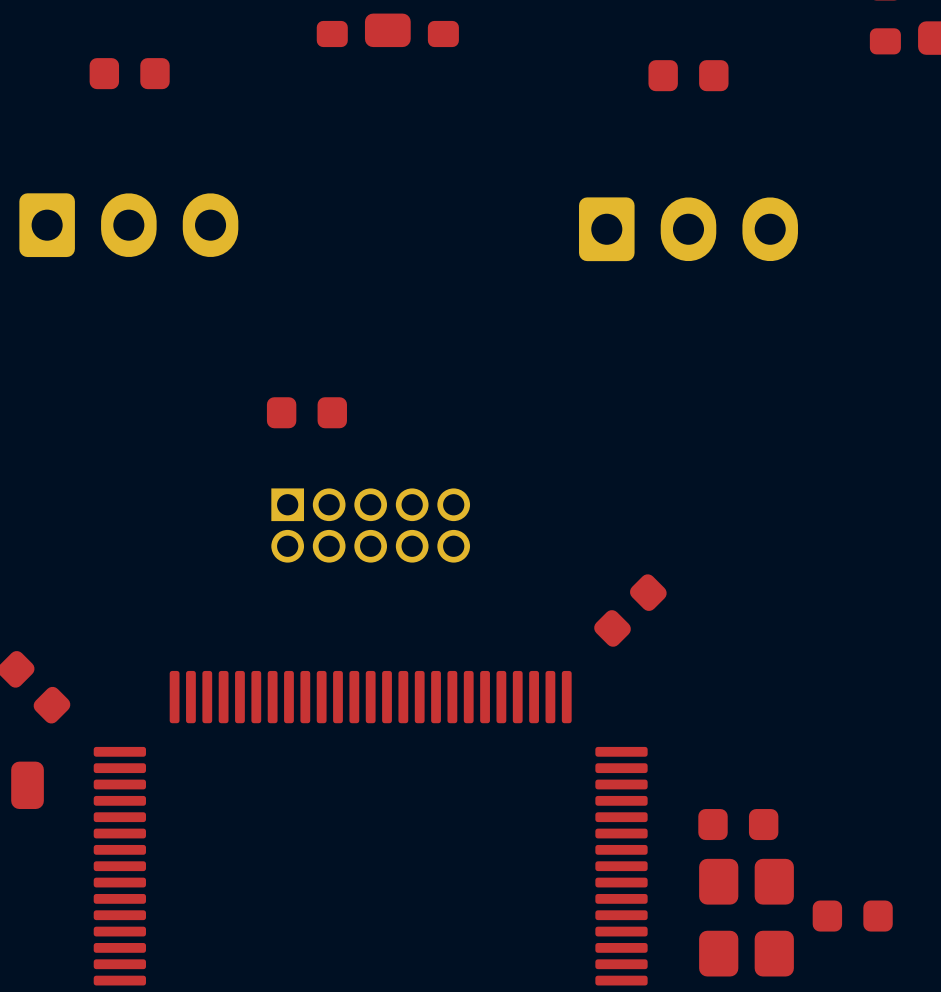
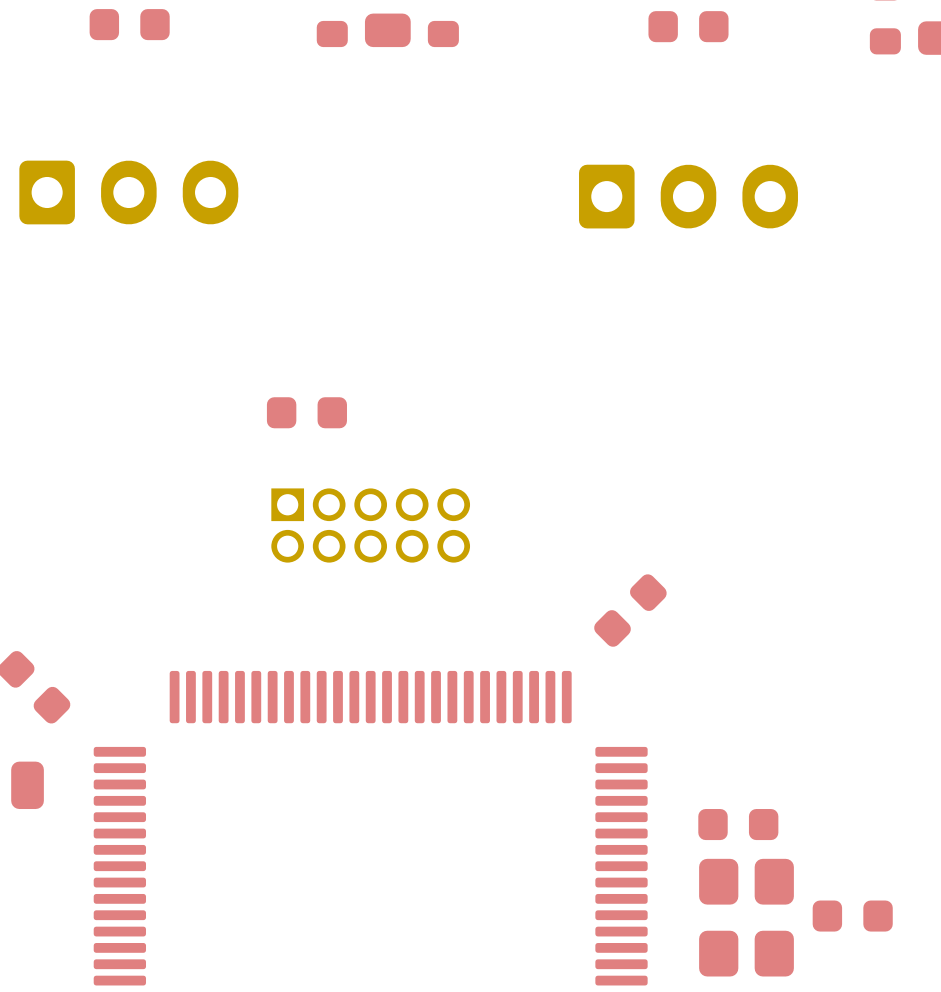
part position: (129, 73) -> (129, 24)
part position: (688, 75) -> (688, 26)
part position: (128, 225) -> (128, 192)
part position: (688, 229) -> (688, 196)

